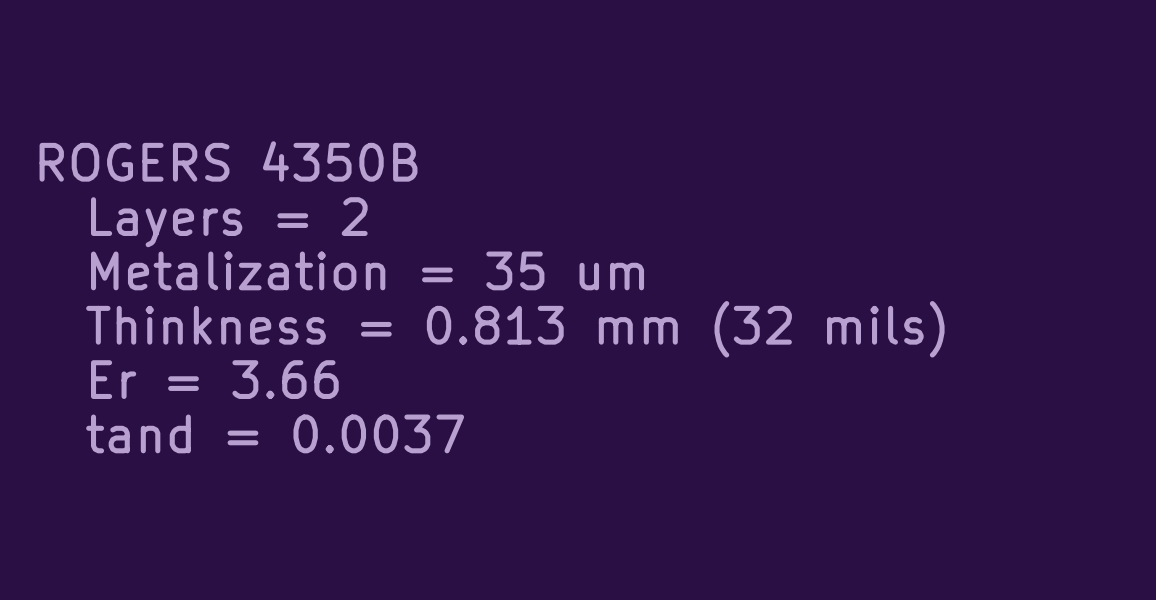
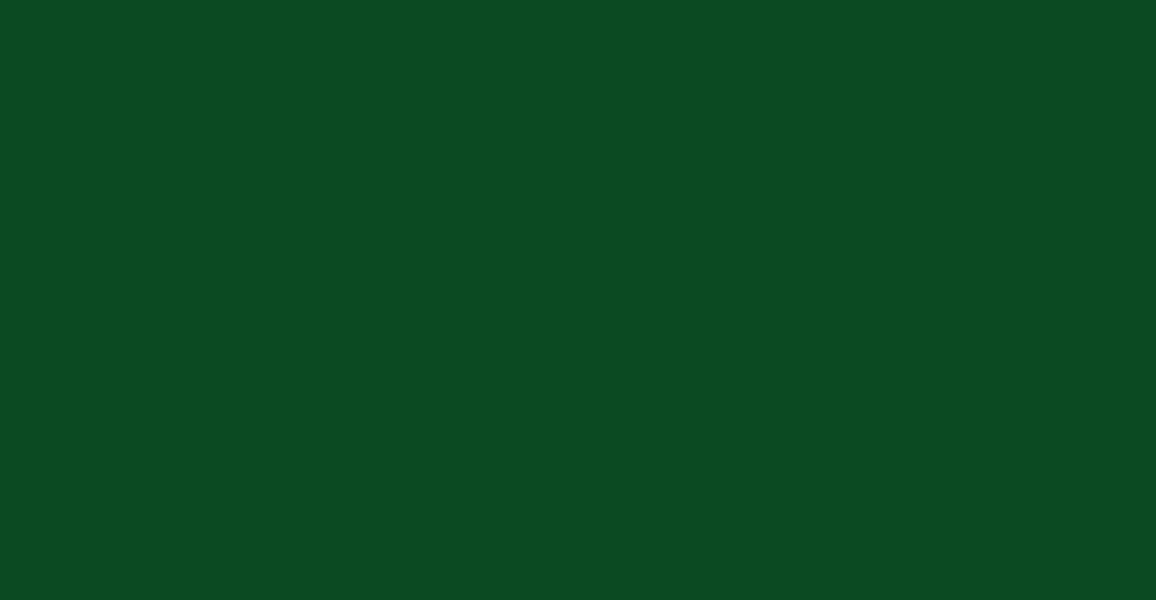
text: ROGERS 4350B (228, 161) -> none
text: Layers = 2 (229, 222) -> none
text: Metalization = 35 um (367, 270) -> none
text: Thinkness = 0.813 mm (32 mils) (515, 329) -> none
text: Er = 3.66 (214, 379) -> none
text: tand = 0.0037 (275, 433) -> none

